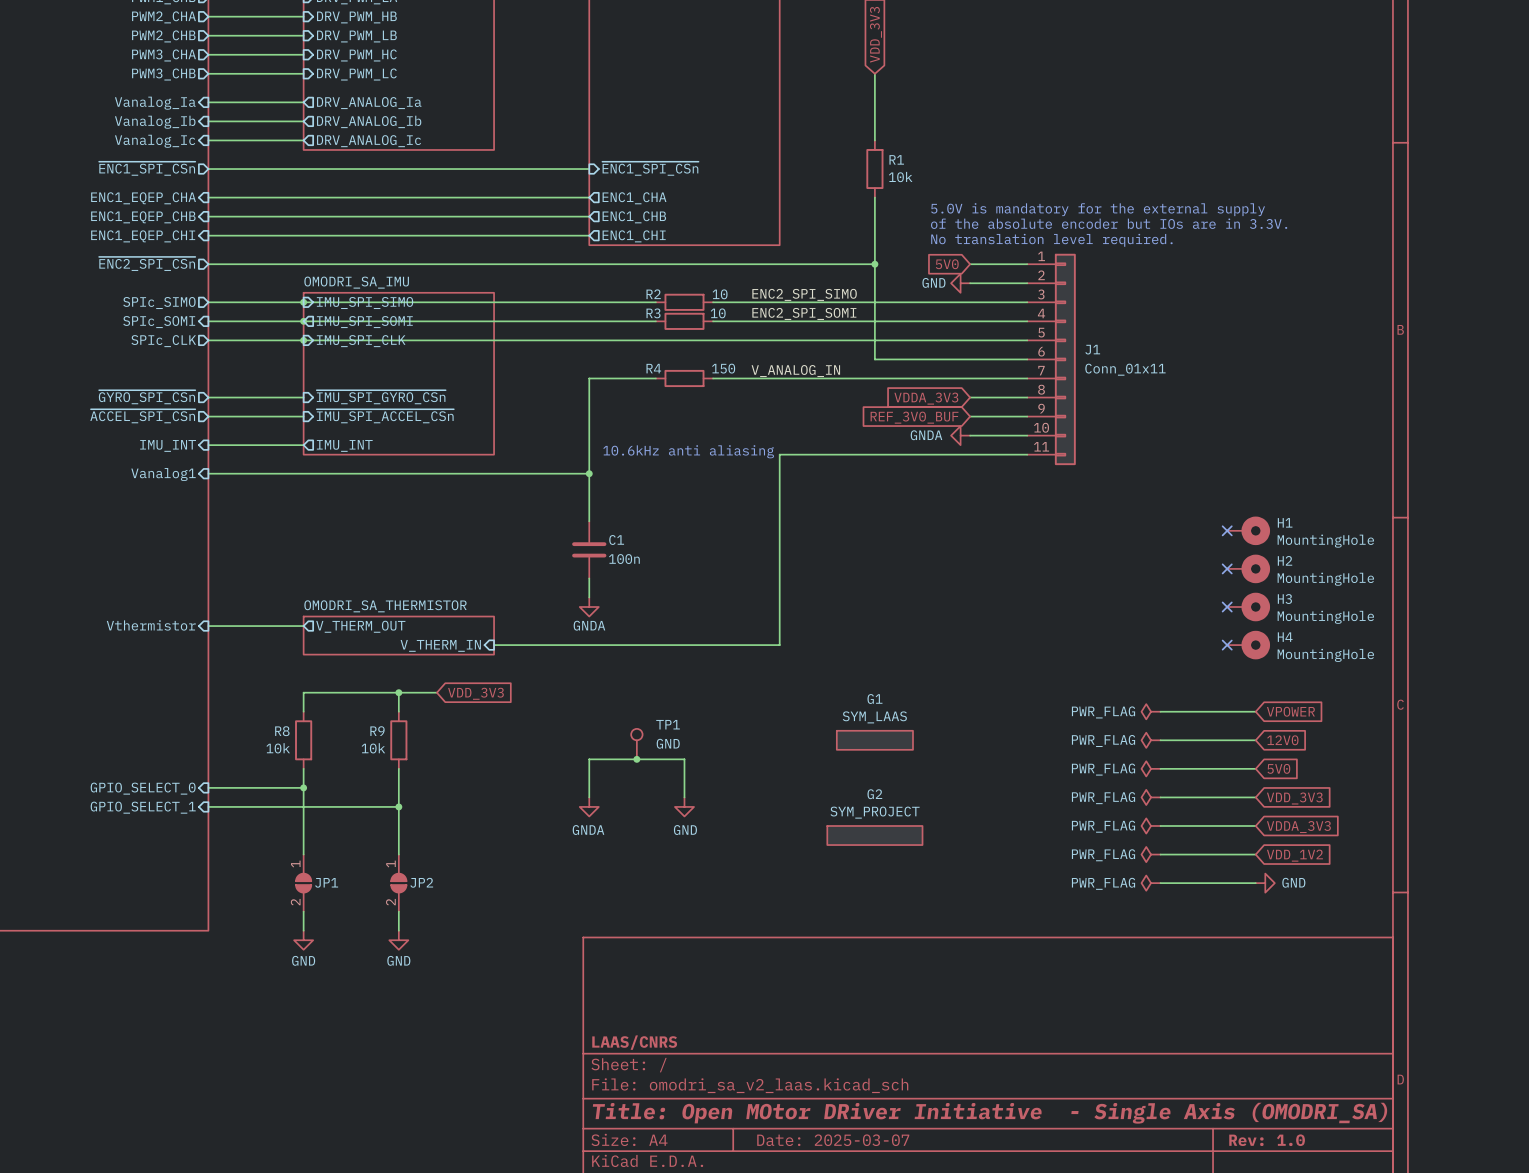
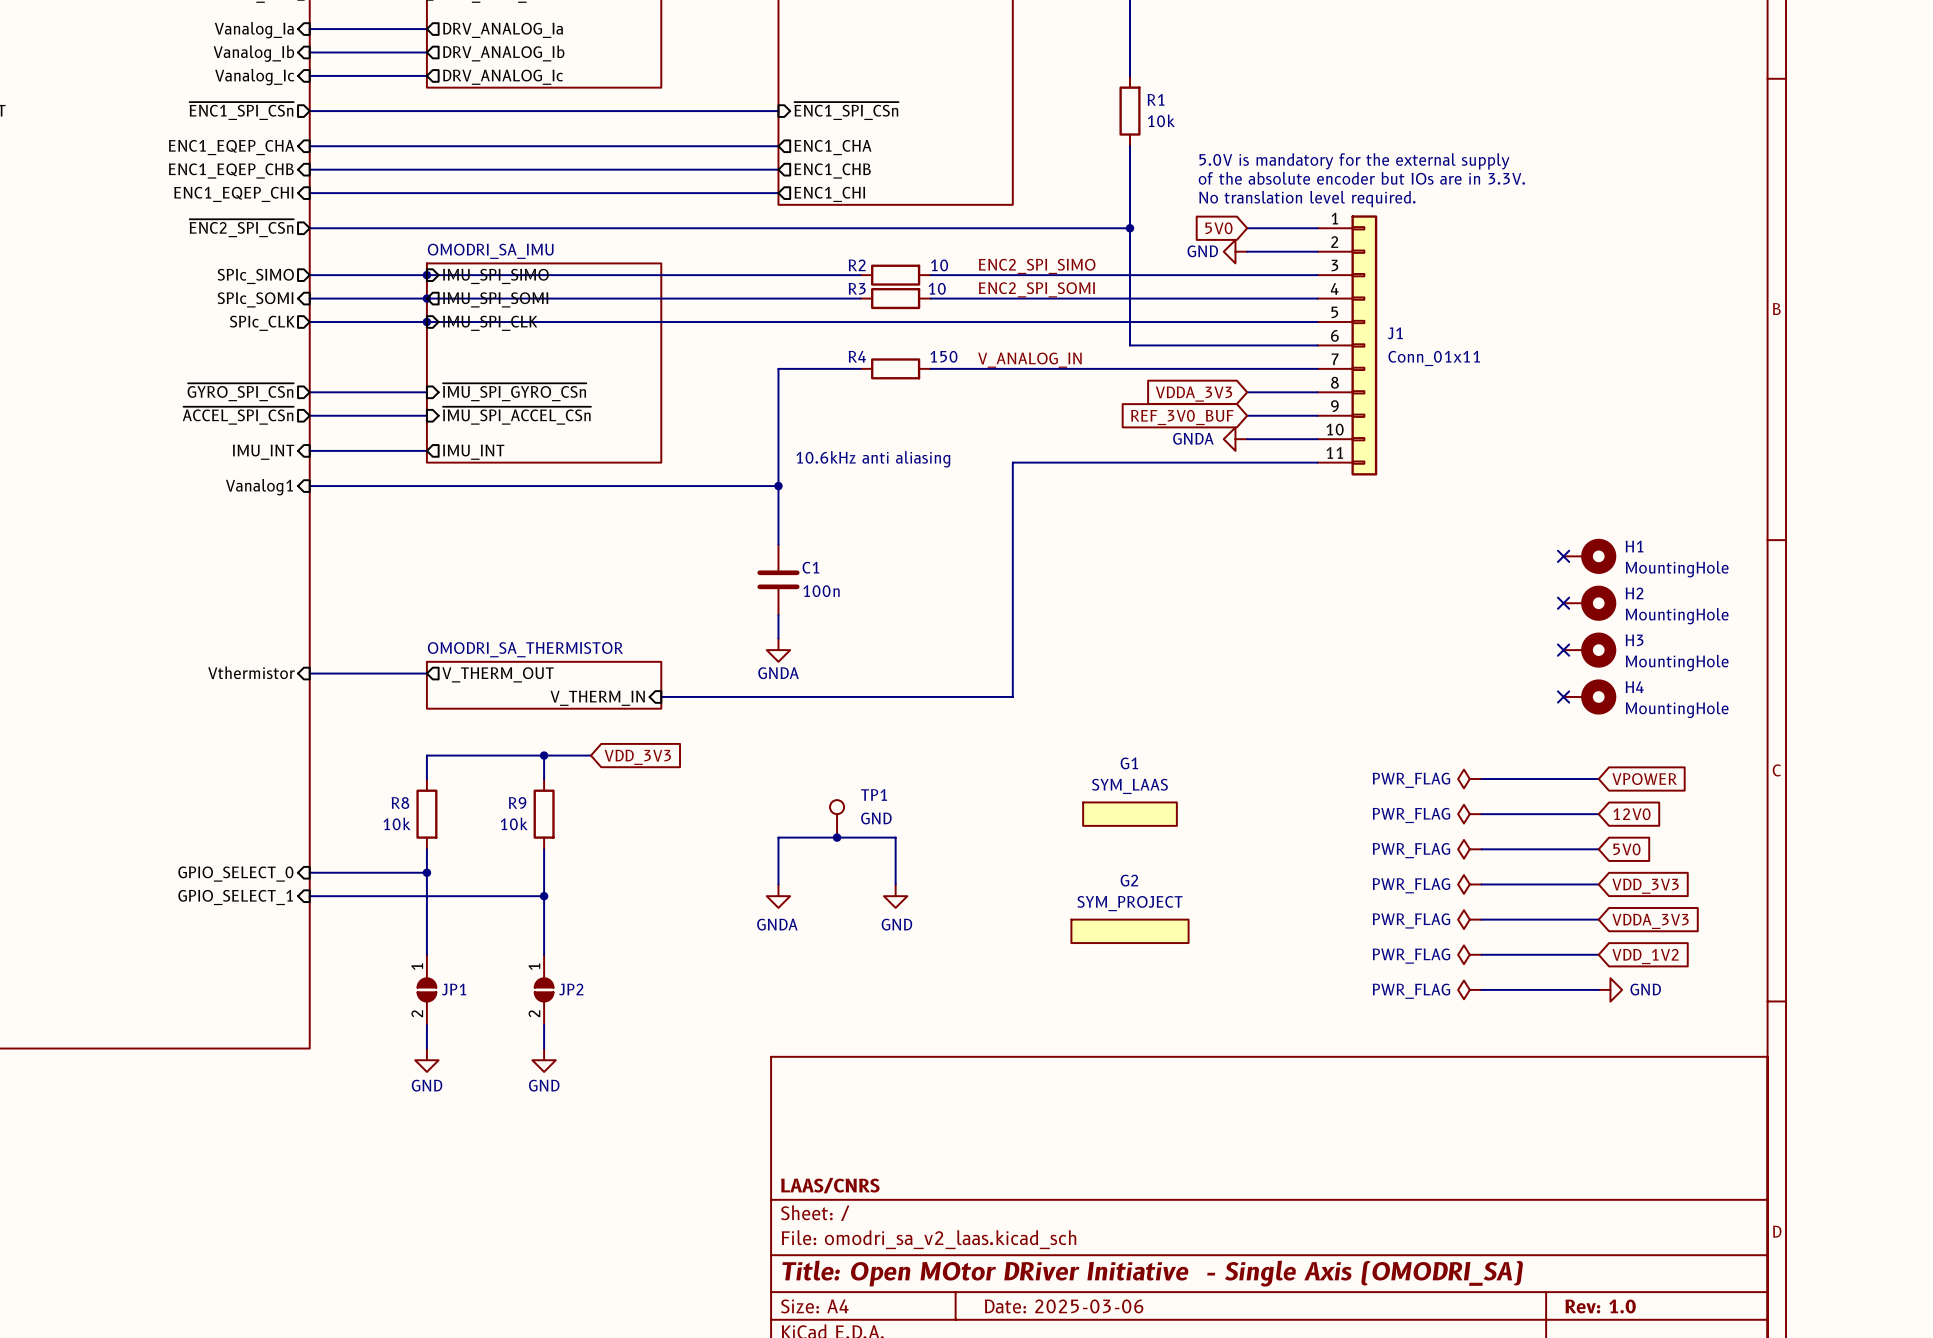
title block: Date: 2025-03-07 (833, 1140) -> Date: 2025-03-06 (1064, 1306)

